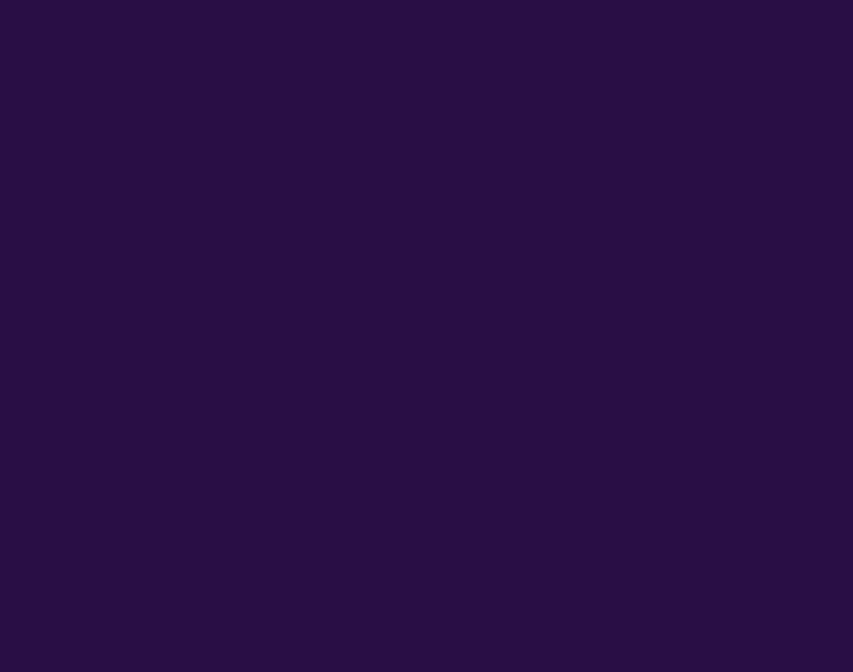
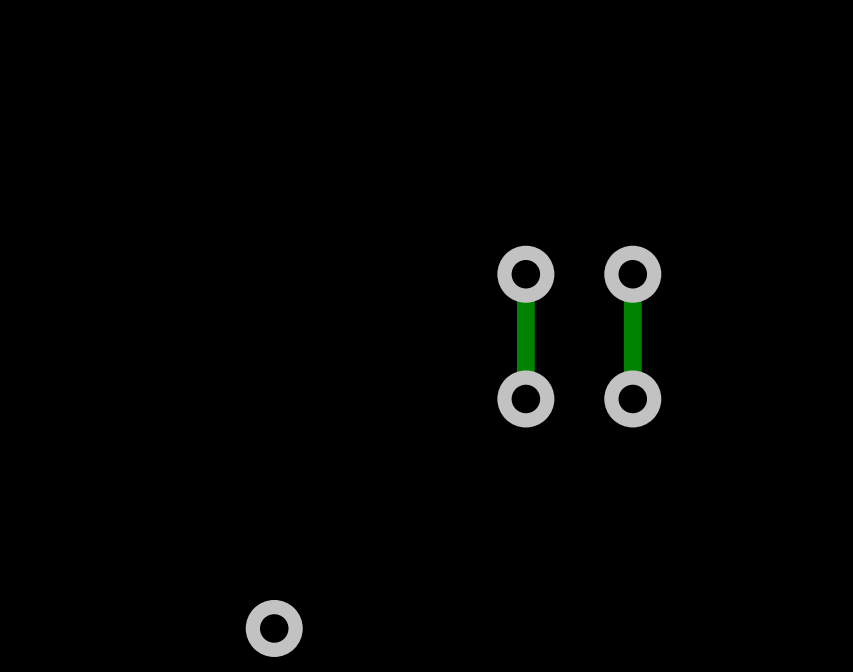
track: none -> (525, 274) (525, 398)
via: none -> (525, 274)
track: none -> (632, 274) (632, 398)
via: none -> (632, 274)
via: none -> (525, 398)
via: none -> (632, 398)
via: none -> (274, 628)

